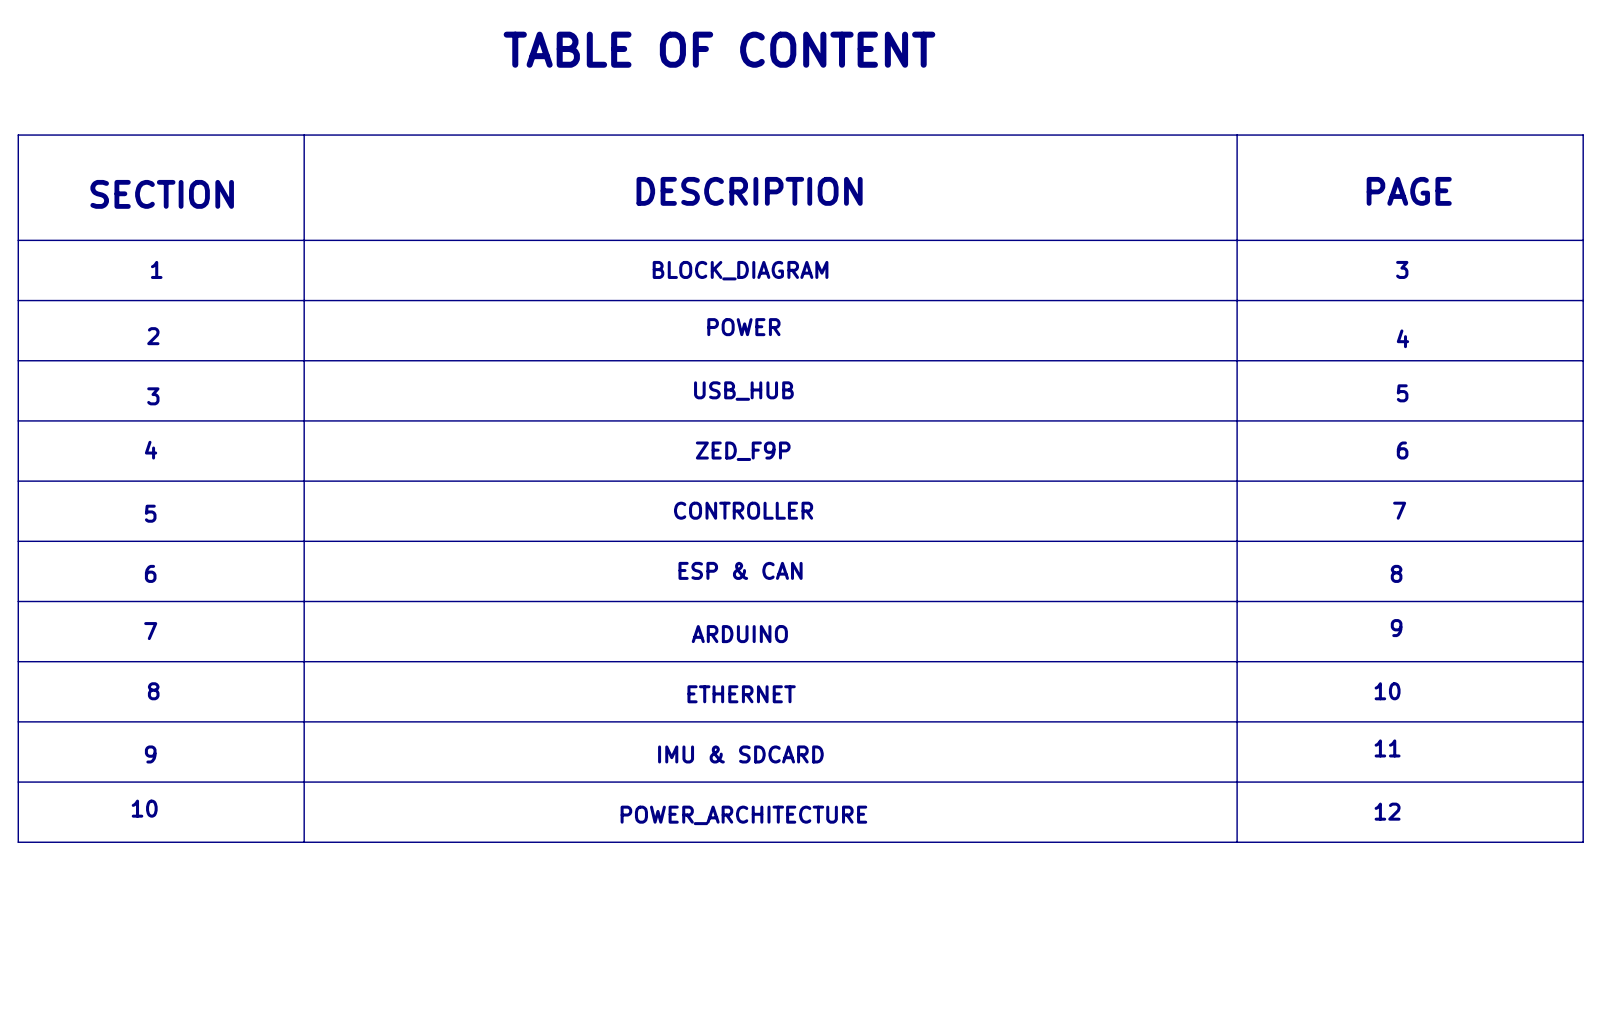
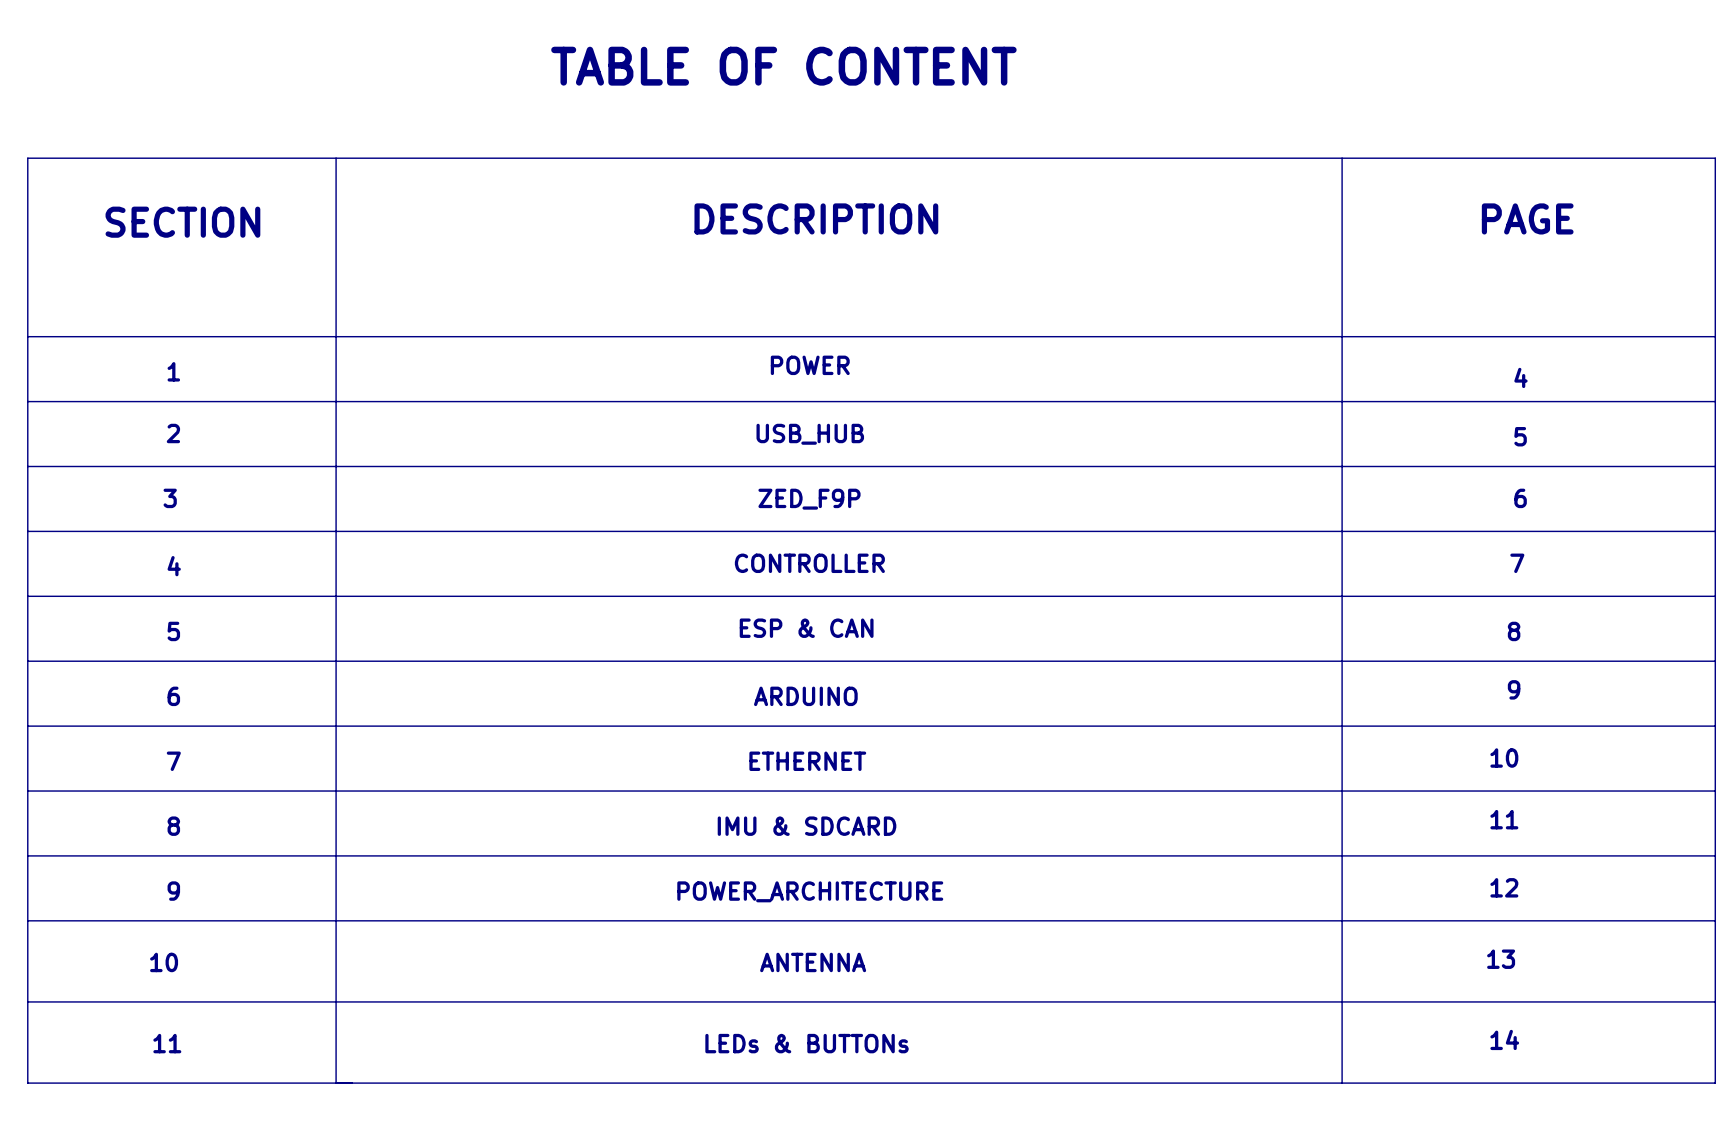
line: (18, 240) (1583, 240) -> none
text position: 1 (156, 269) -> 1 (173, 371)
text: 3 (1402, 269) -> none
text: BLOCK_DIAGRAM (740, 270) -> none
text position: 2 (153, 336) -> 2 (173, 433)
text: 3 (153, 396) -> none
text: 4 (151, 450) -> 3 (170, 498)
text position: 5 (150, 513) -> 5 (173, 631)
text: none -> 4 (174, 566)
text position: 6 (150, 573) -> 6 (173, 696)
text position: 7 (150, 631) -> 7 (173, 761)
text position: 8 (153, 691) -> 8 (173, 826)
text position: 9 (150, 754) -> 9 (173, 891)
text position: 10 (144, 808) -> 10 (164, 962)
line: none -> (27, 920) (27, 1083) (1715, 1083) (1715, 920)
line: none -> (336, 920) (336, 1083)
line: none -> (1342, 920) (1342, 1083)
text: none -> 13 (1501, 959)
text: none -> ANTENNA (813, 962)
line: none -> (27, 1001) (1715, 1001)
text: none -> 14 (1504, 1039)
text: none -> 11 (167, 1043)
text: none -> LEDs & BUTTONs (807, 1043)

